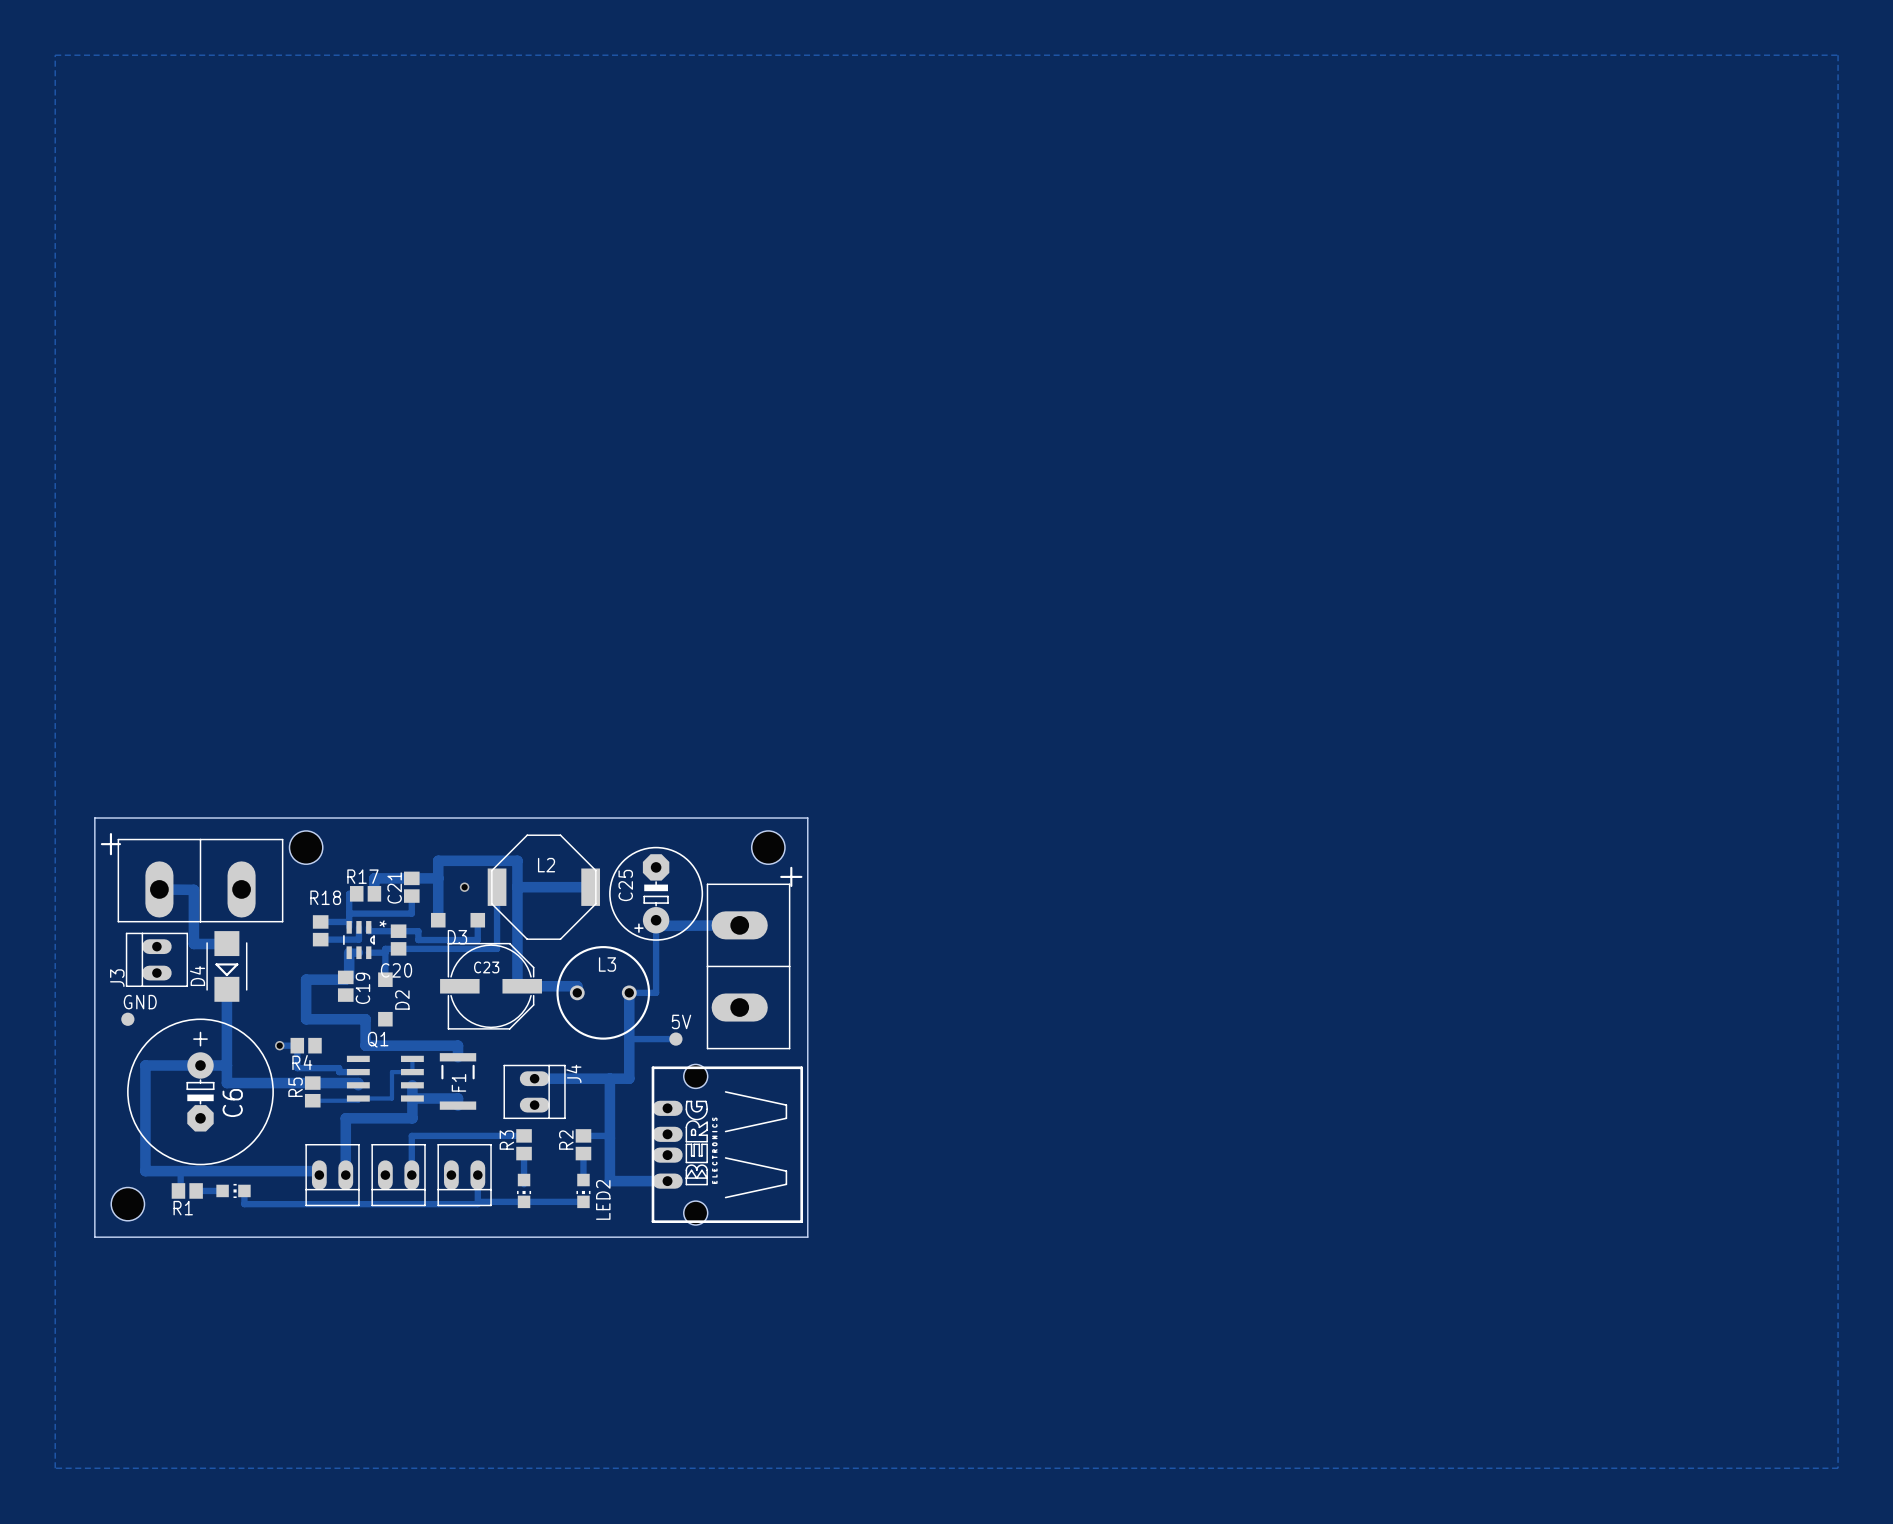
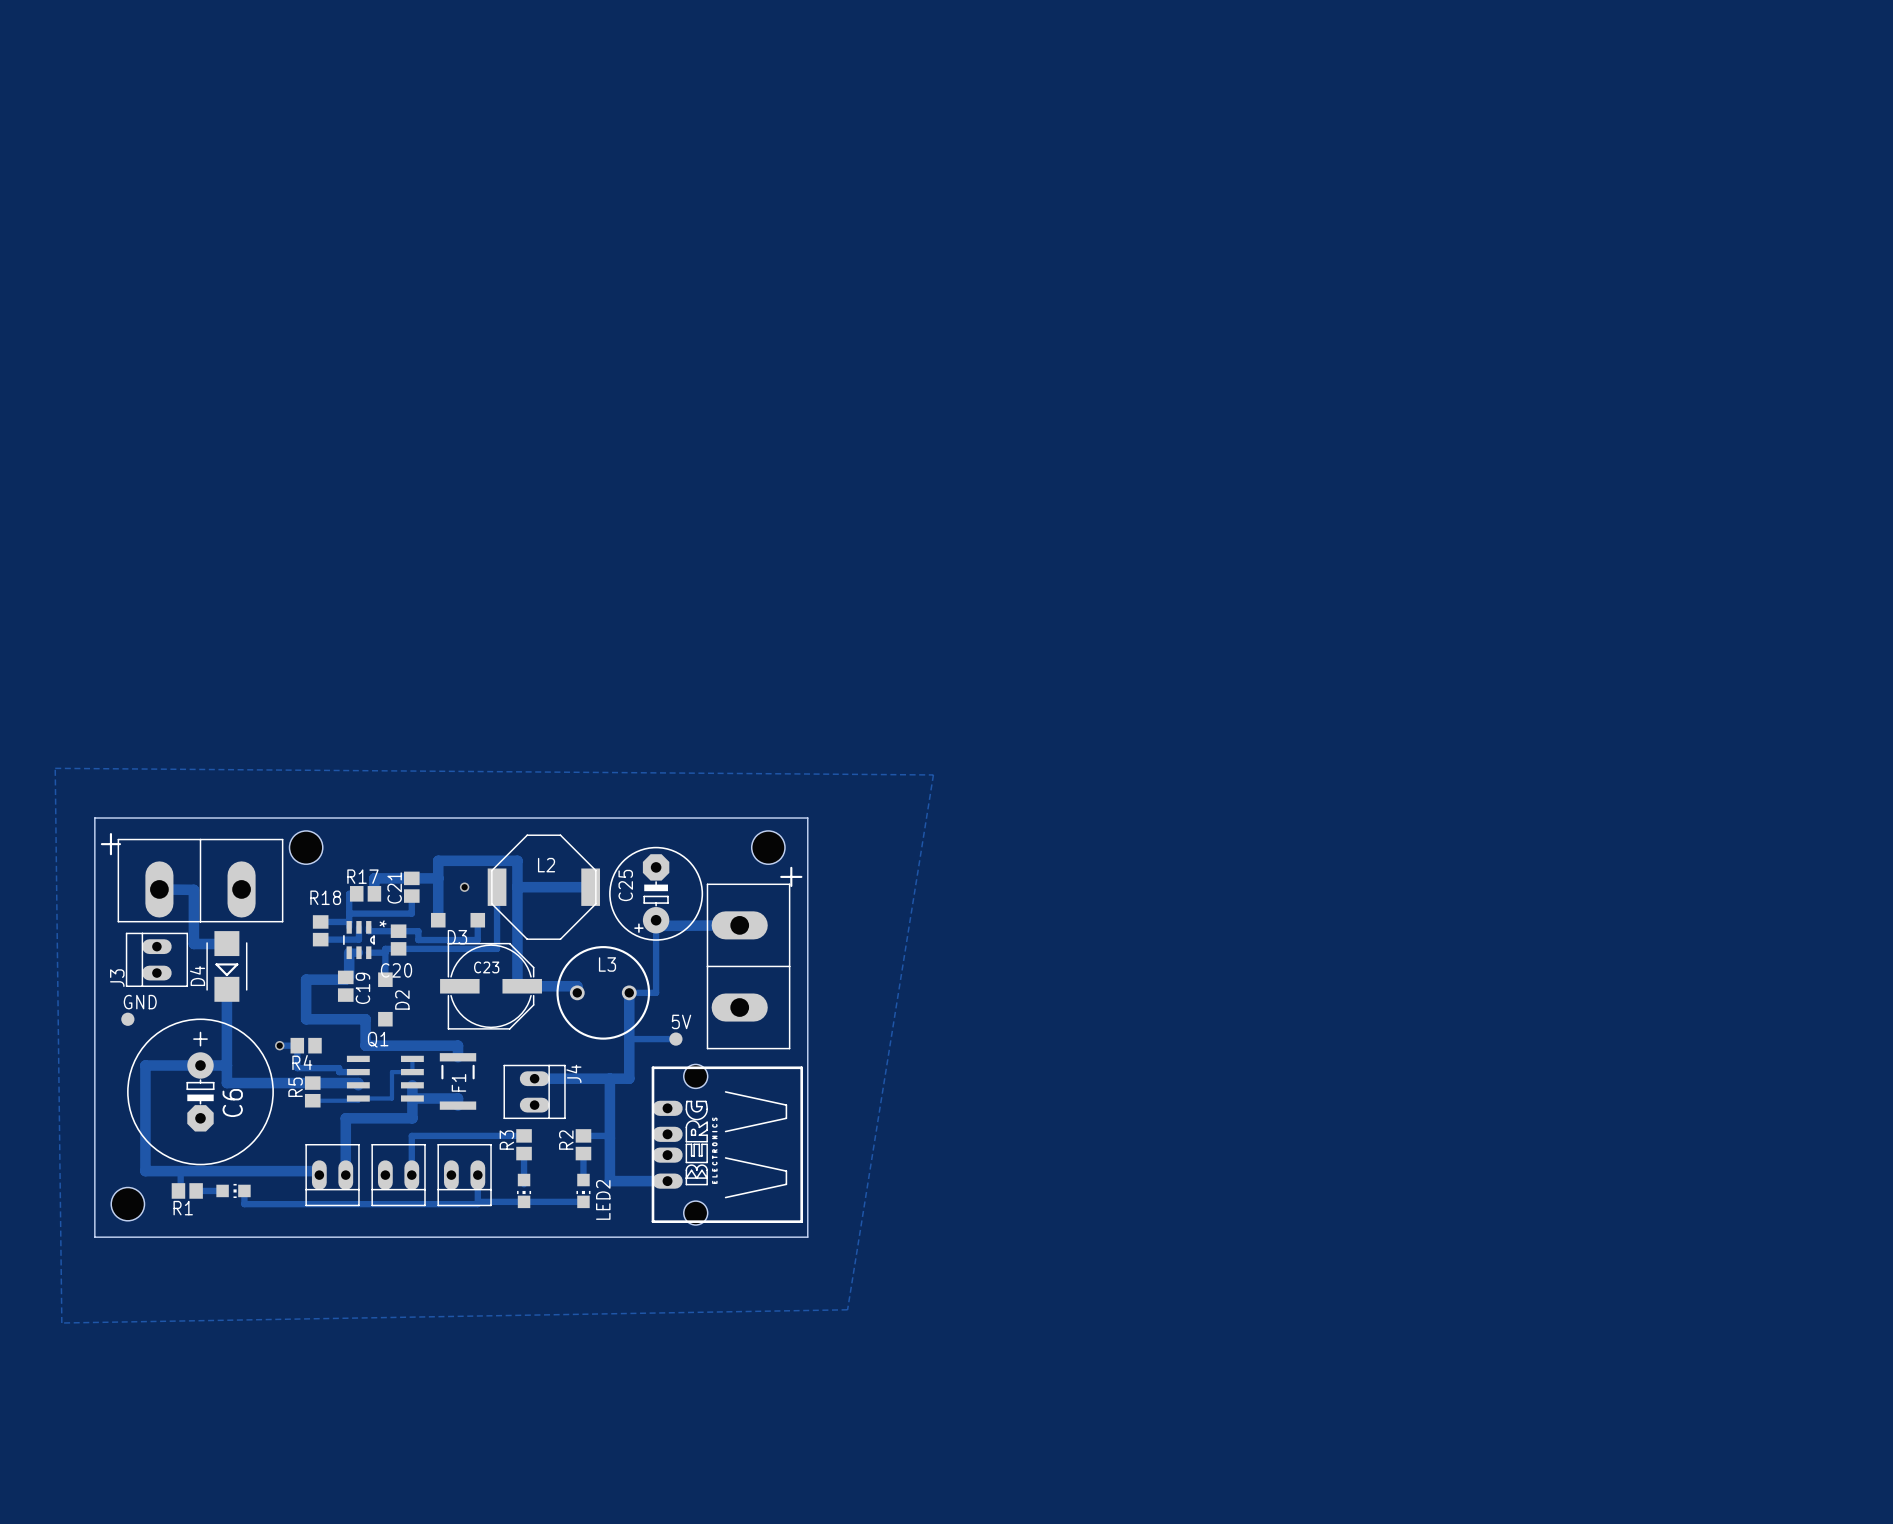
zone outline: (55, 55) (1838, 55) (1838, 1468) (55, 1468) (55, 55) -> none
zone outline: none -> (55, 768) (933, 774) (847, 1309) (61, 1323) (55, 768)

